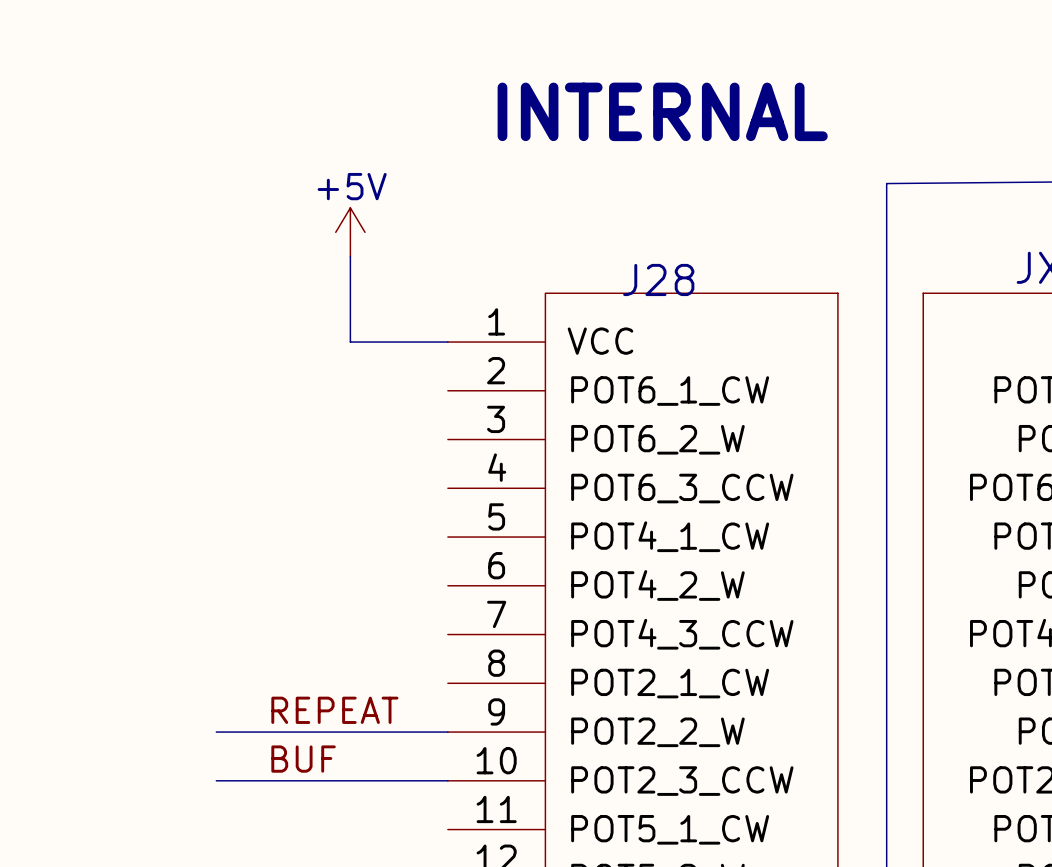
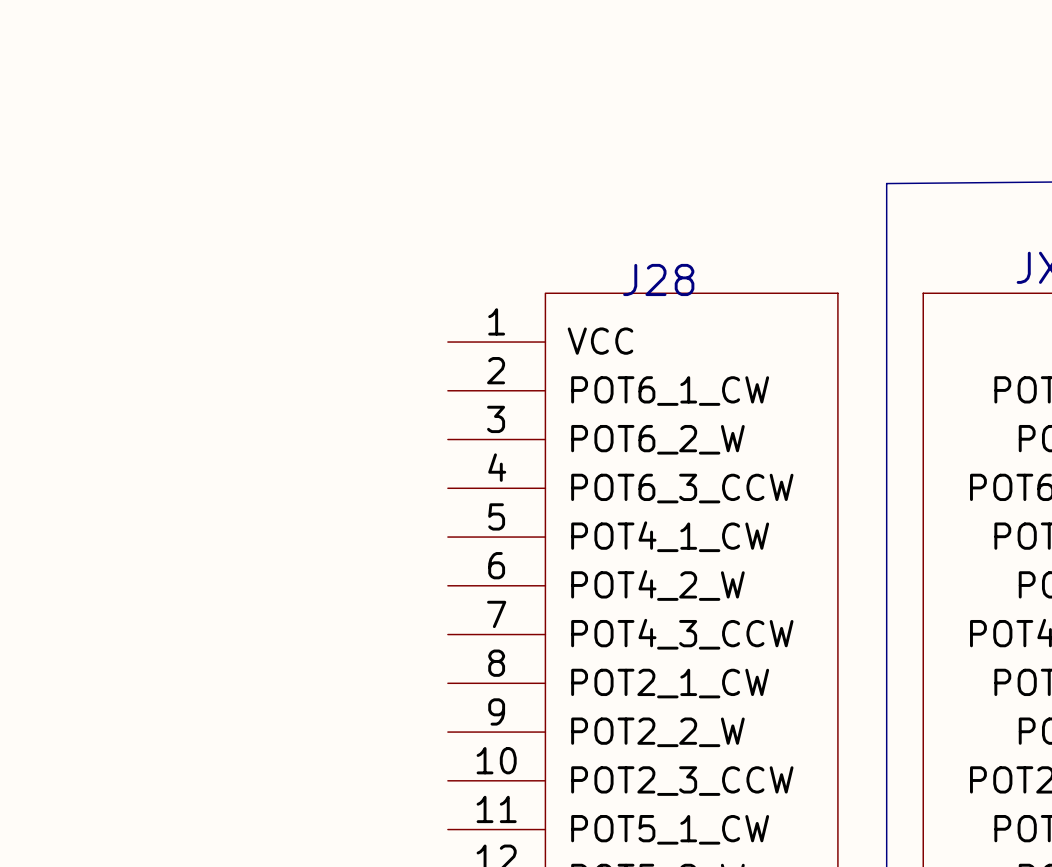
text: INTERNAL (662, 111) -> none
power symbol: +5V (350, 232) -> none
wire: (350, 256) (350, 342) (447, 342) -> none
label: REPEAT (334, 710) -> none
wire: (216, 732) (447, 732) -> none
label: BUF (303, 759) -> none
wire: (216, 780) (447, 780) -> none

